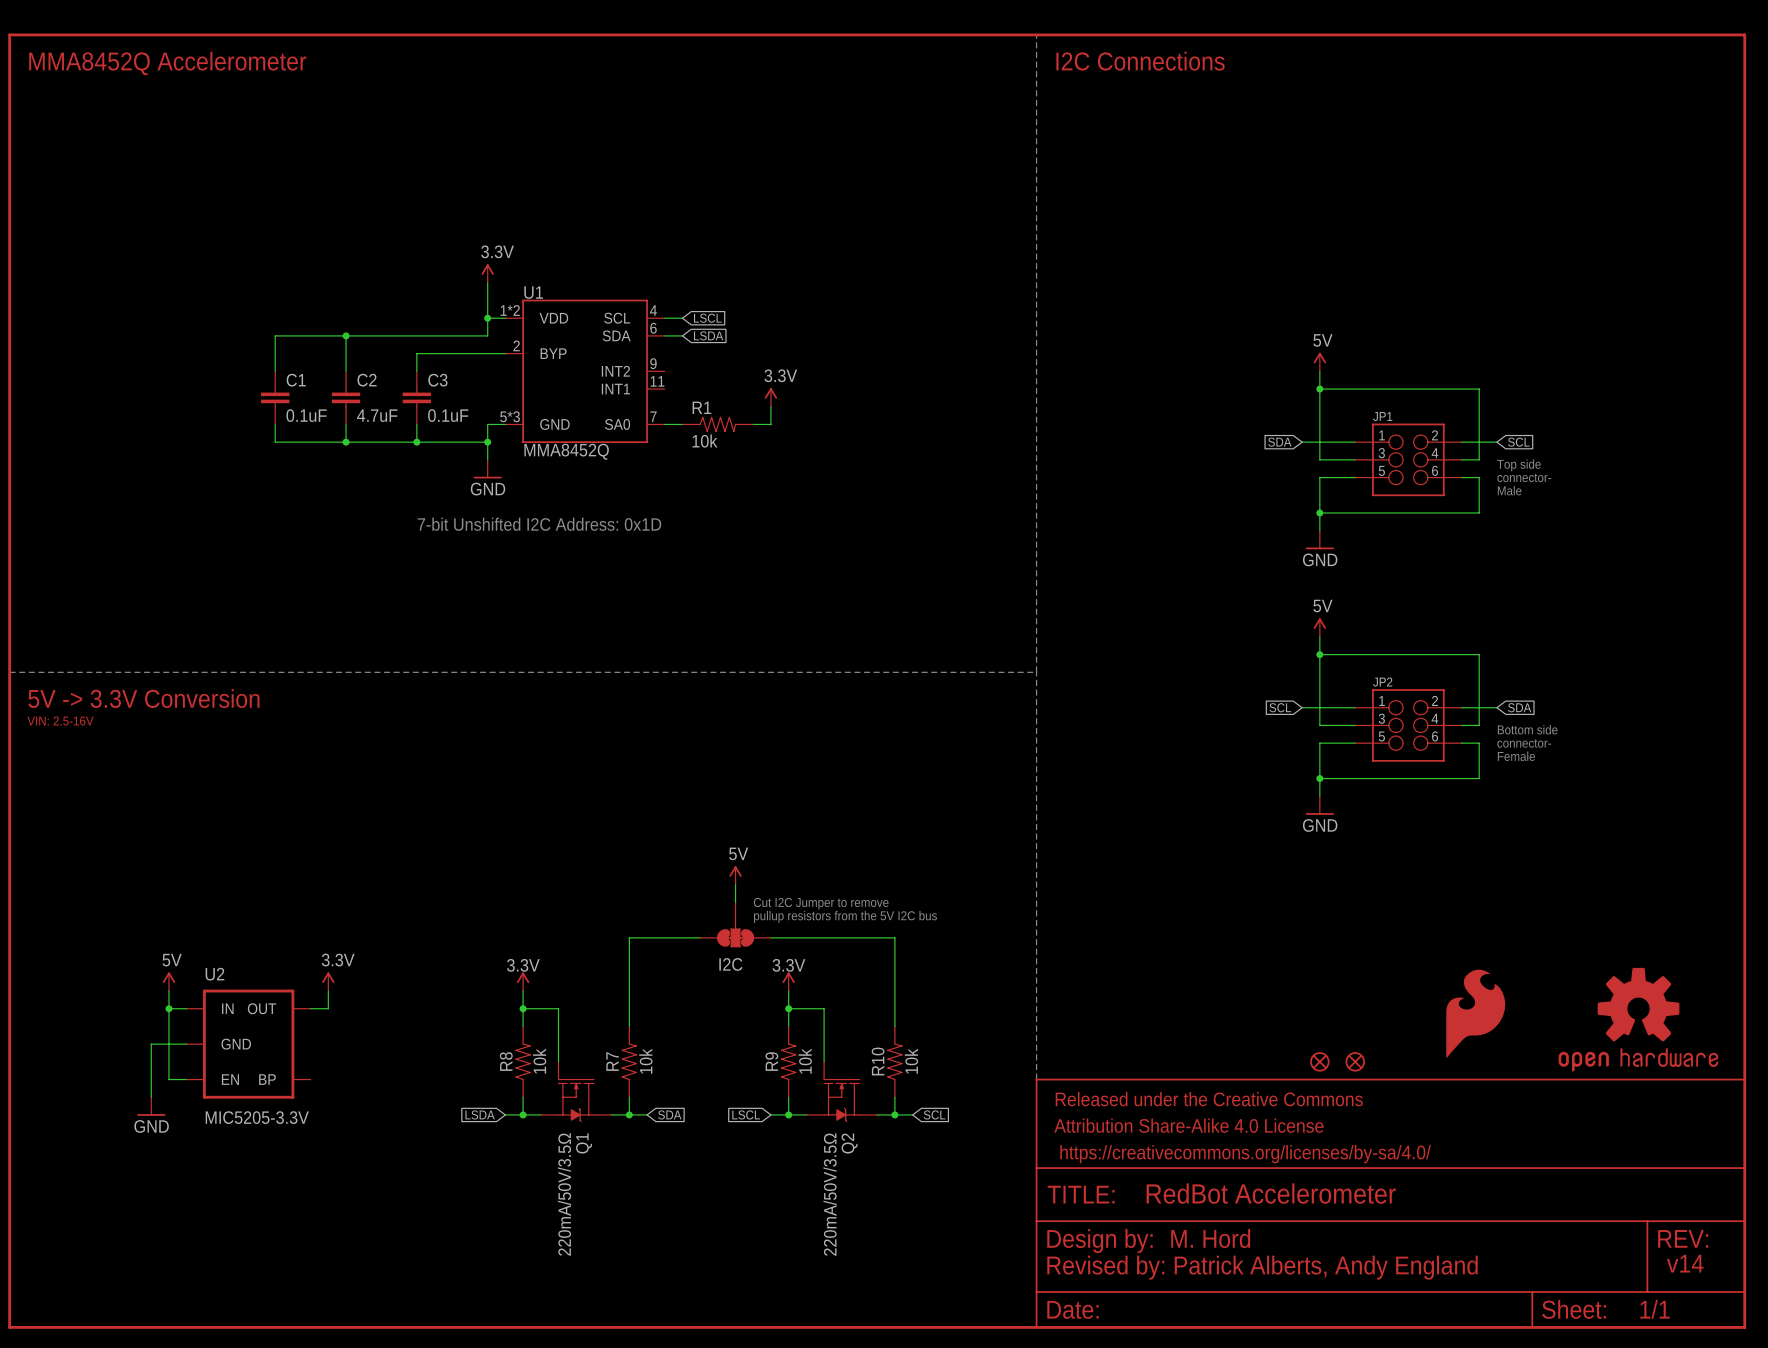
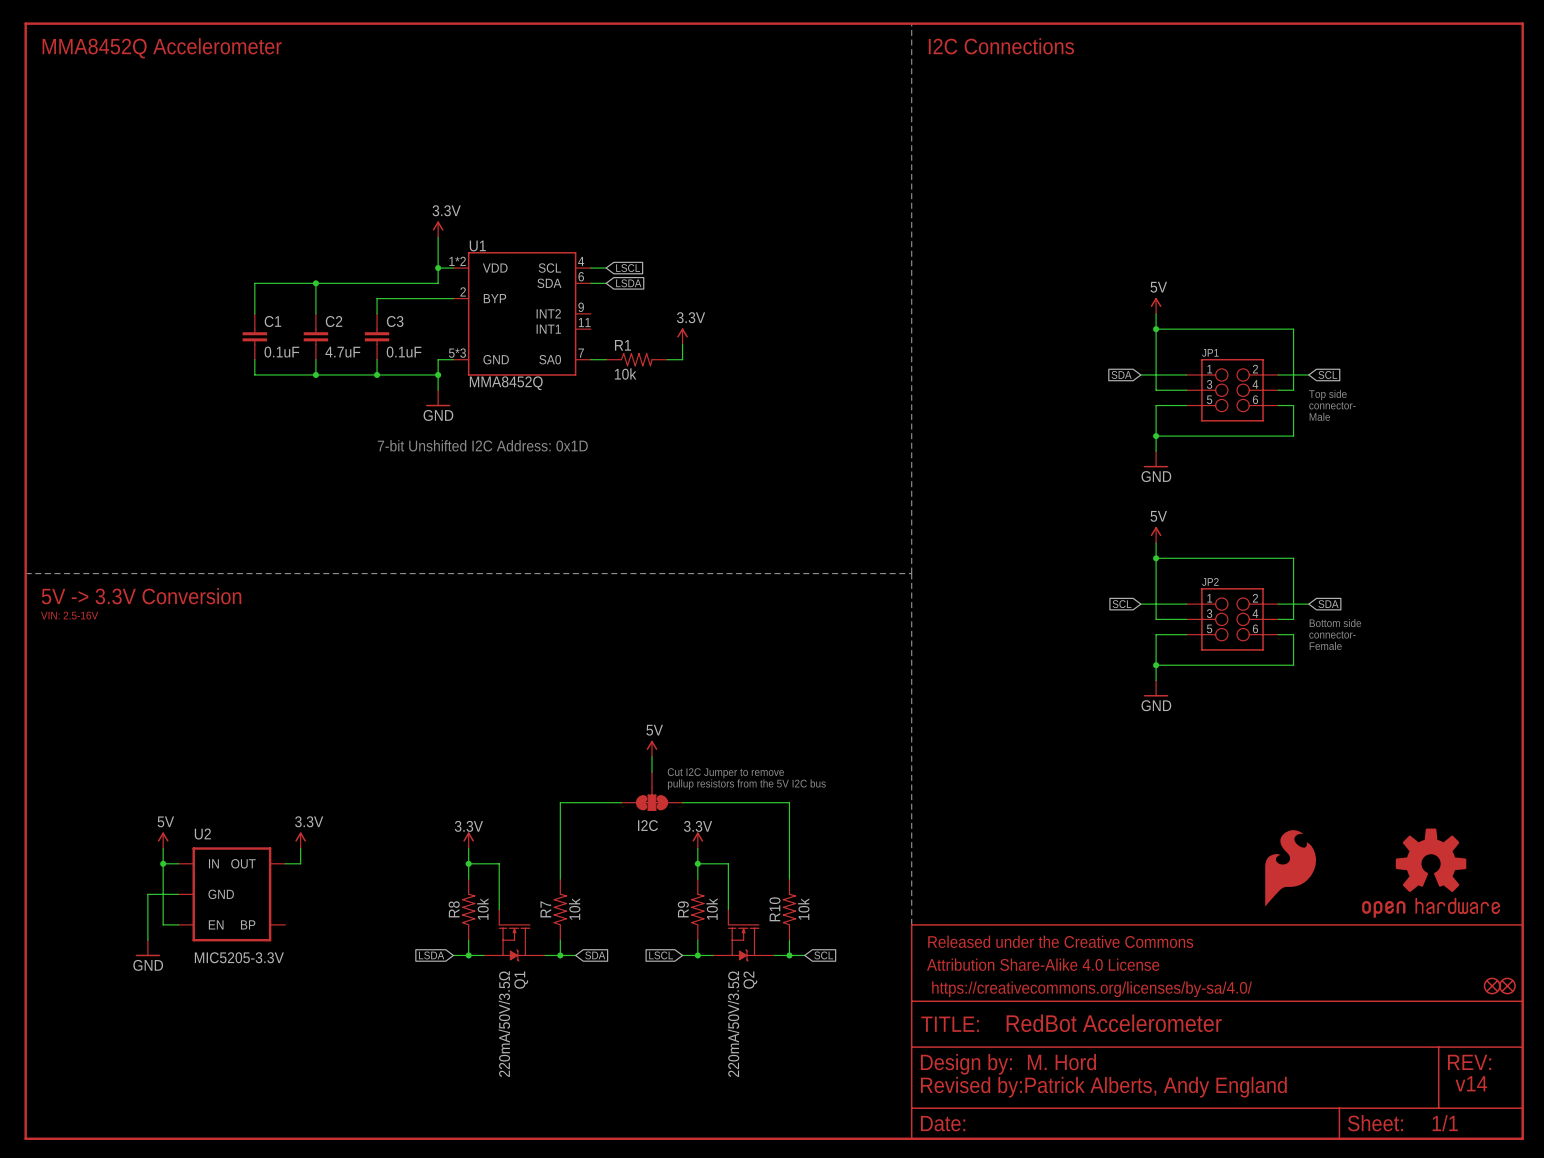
part: (1319, 1061) -> none
part: (1355, 1061) -> none
part: none -> (1492, 986)
part: none -> (1507, 986)
text: Revised by: Patrick Alberts, Andy England (1262, 1267) -> Revised by:Patrick Alberts, Andy England (1103, 1087)

